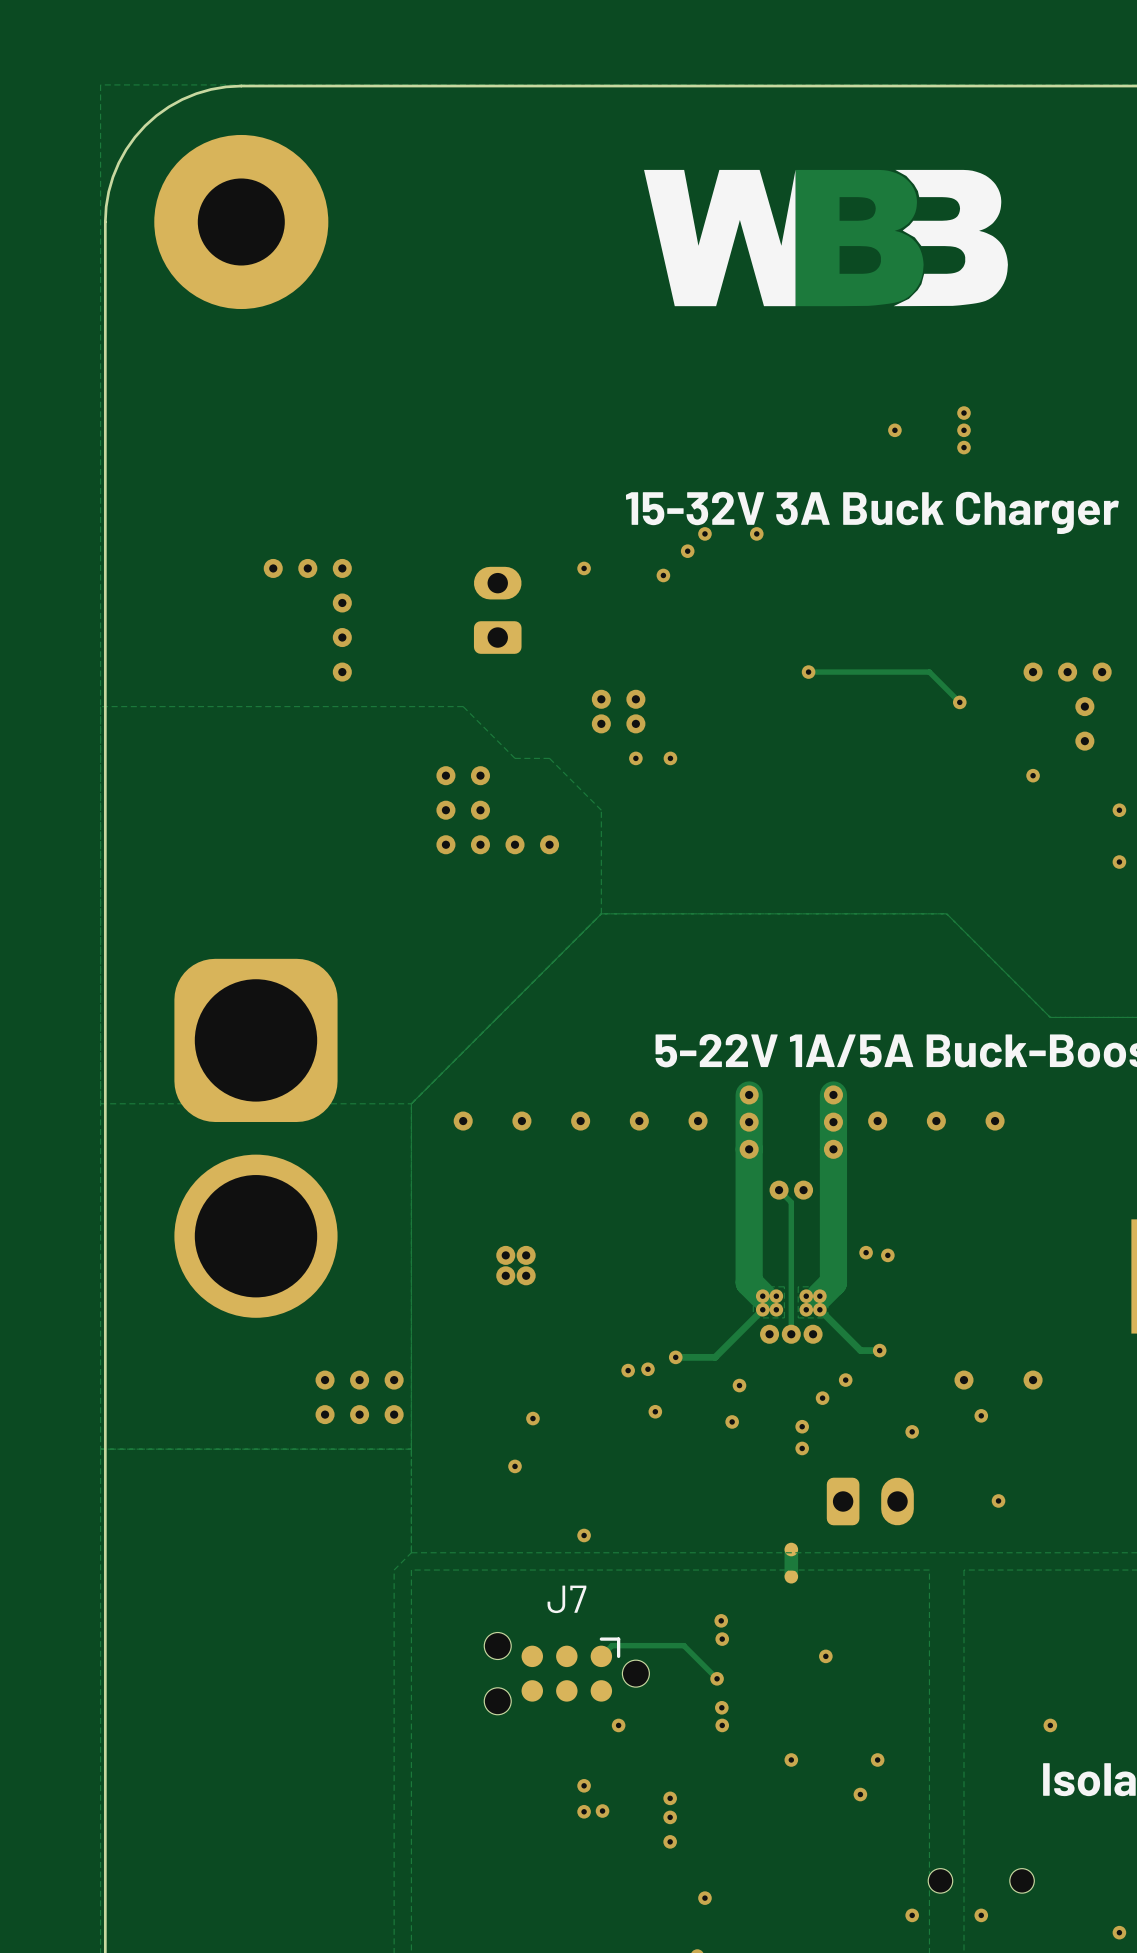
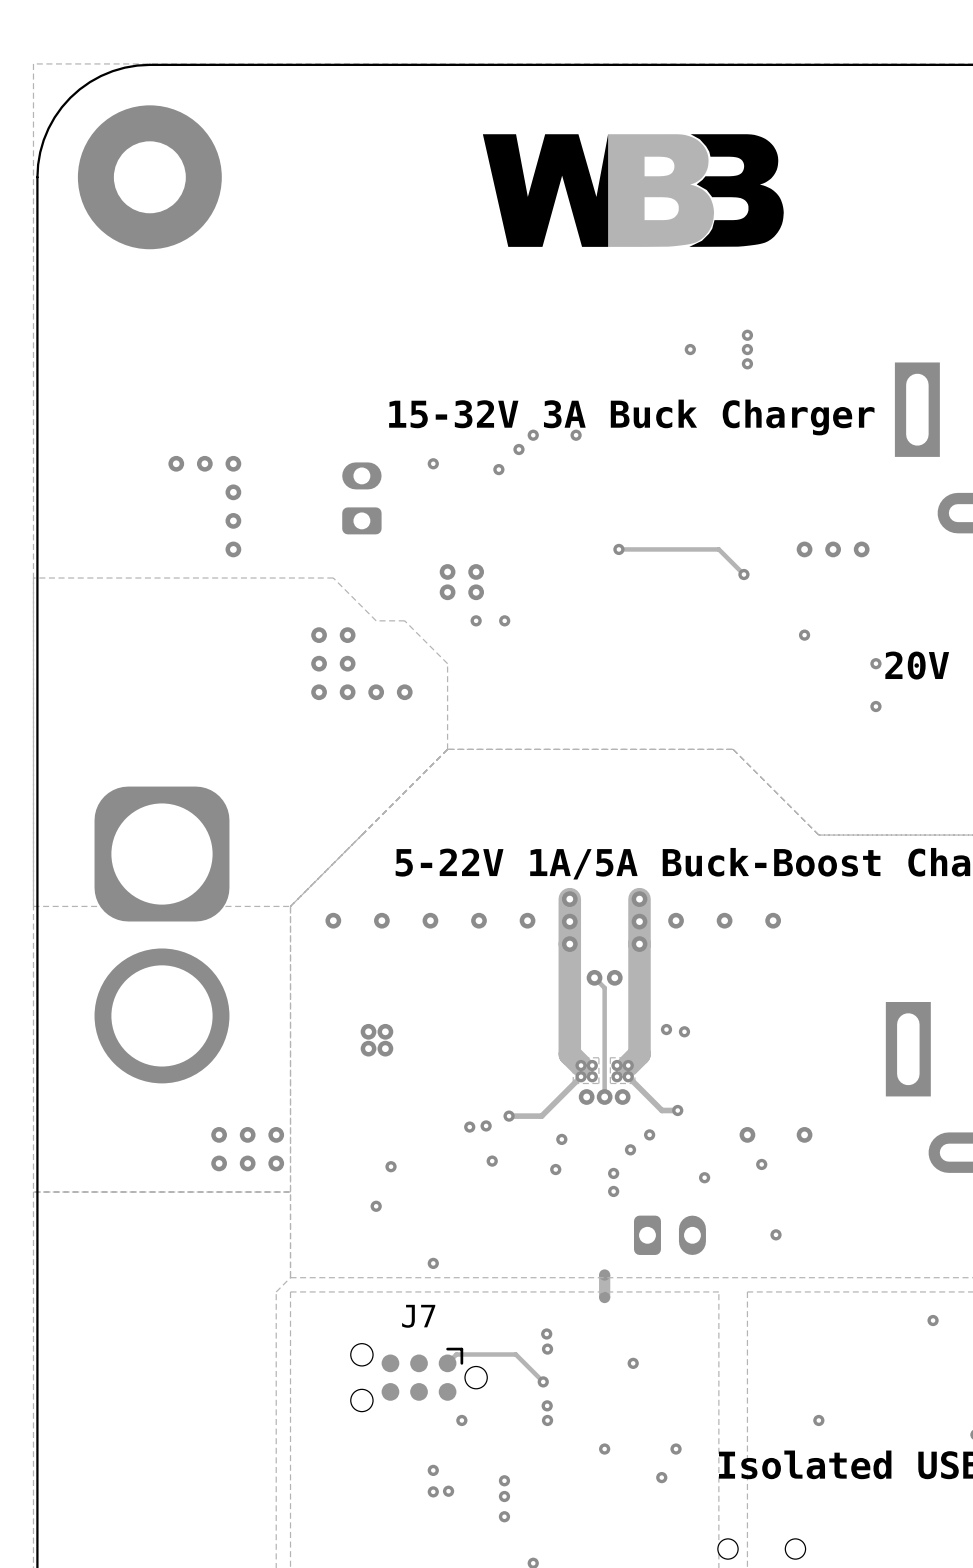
via: (1084, 706) -> none
via: (1084, 741) -> none

